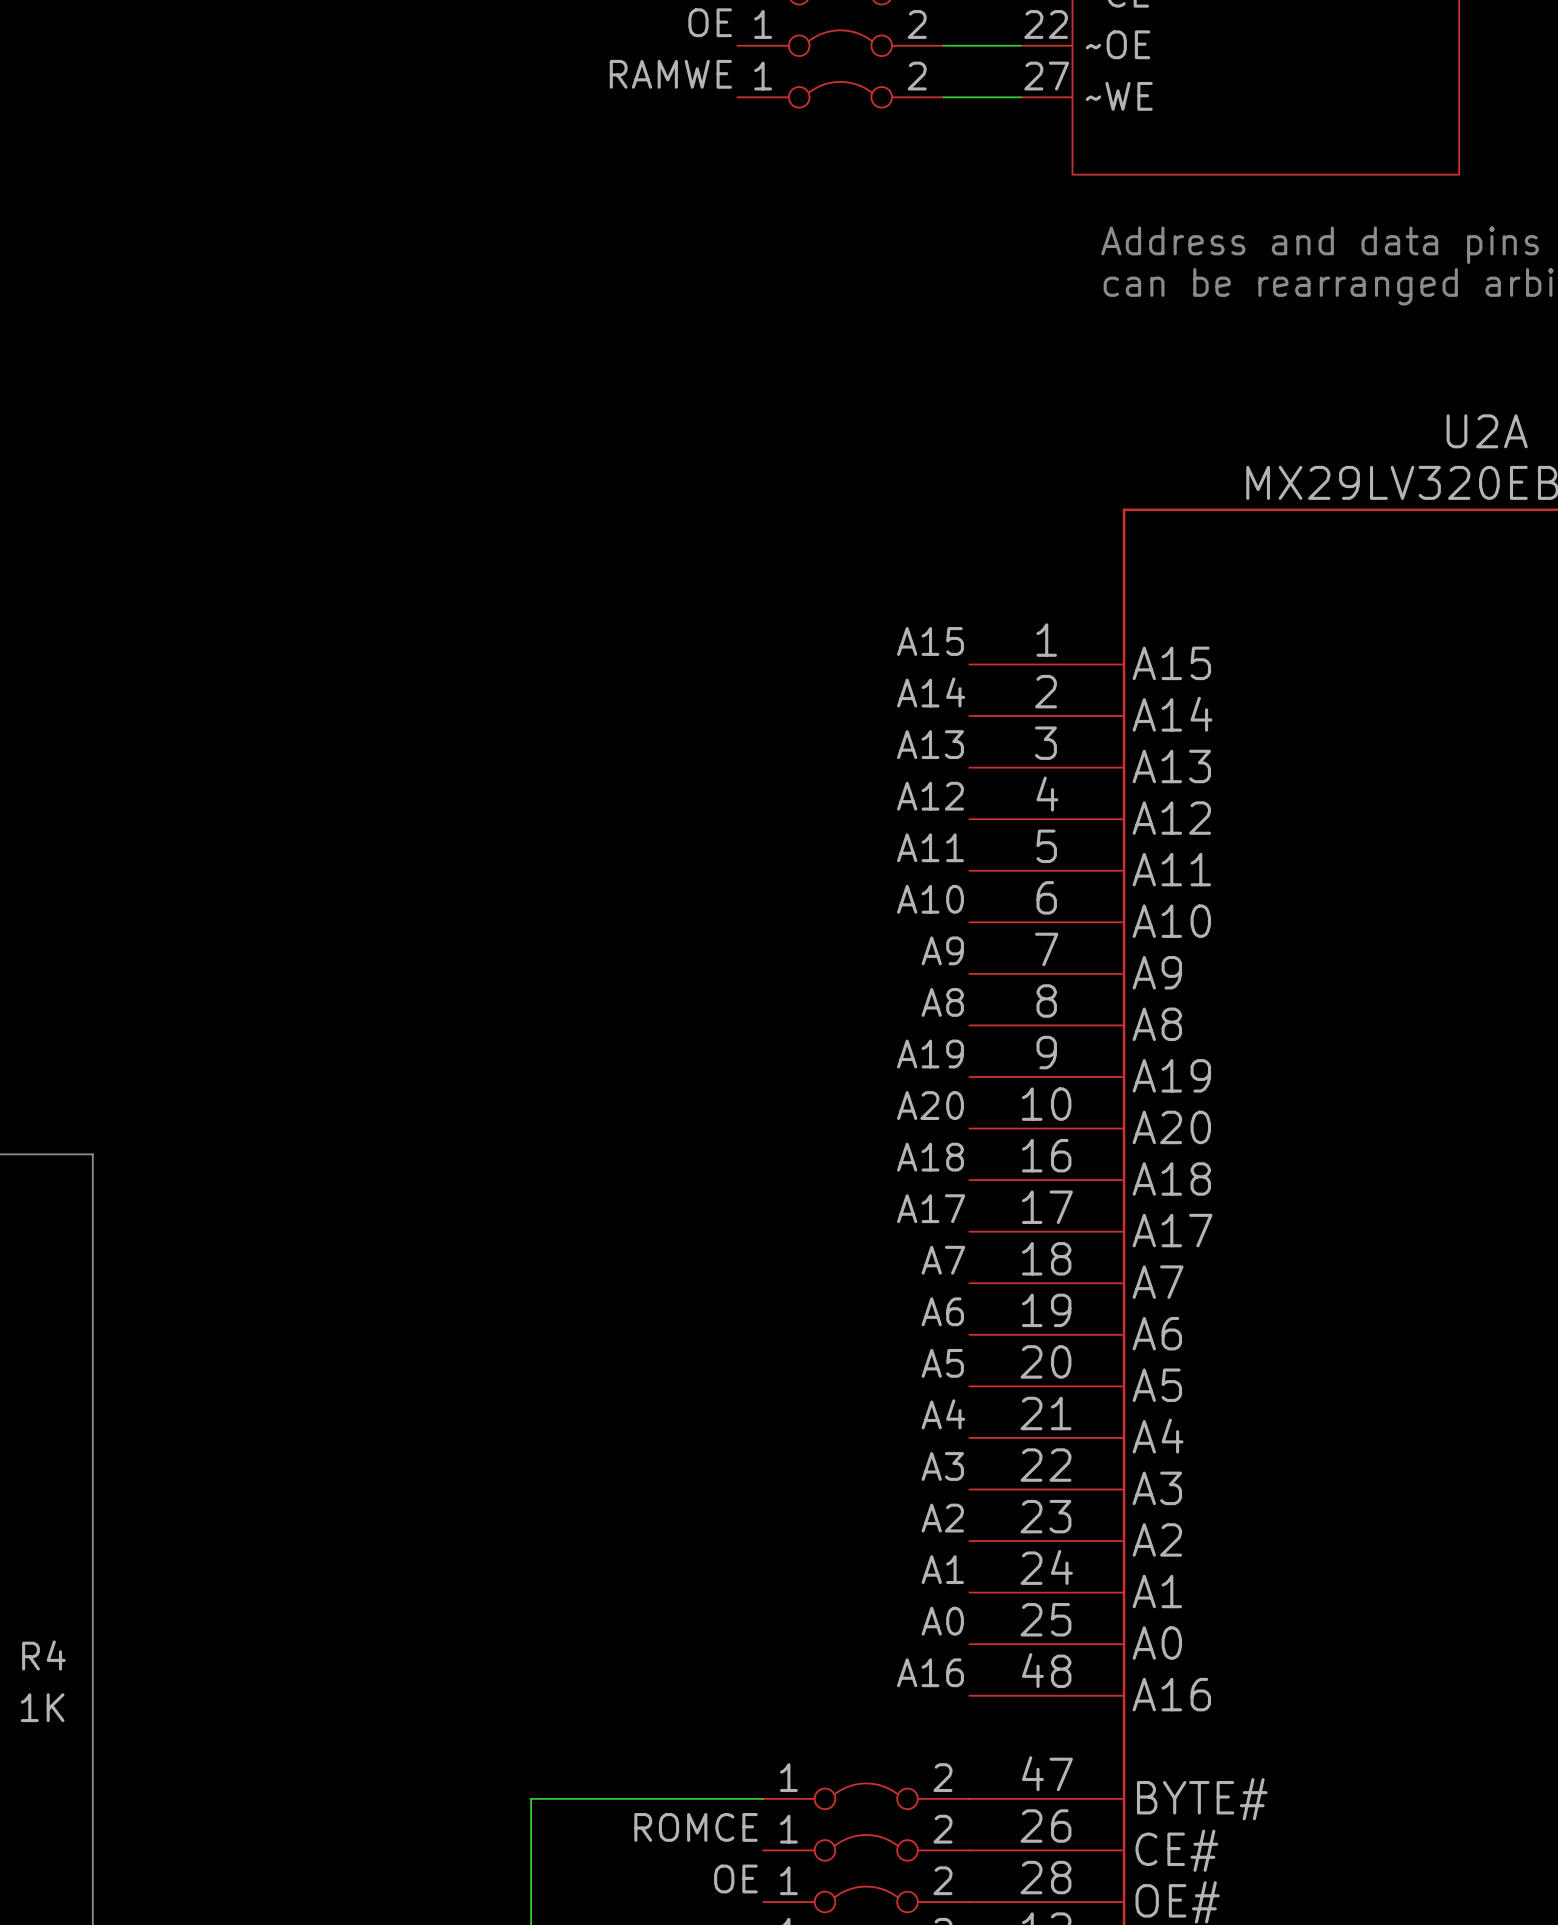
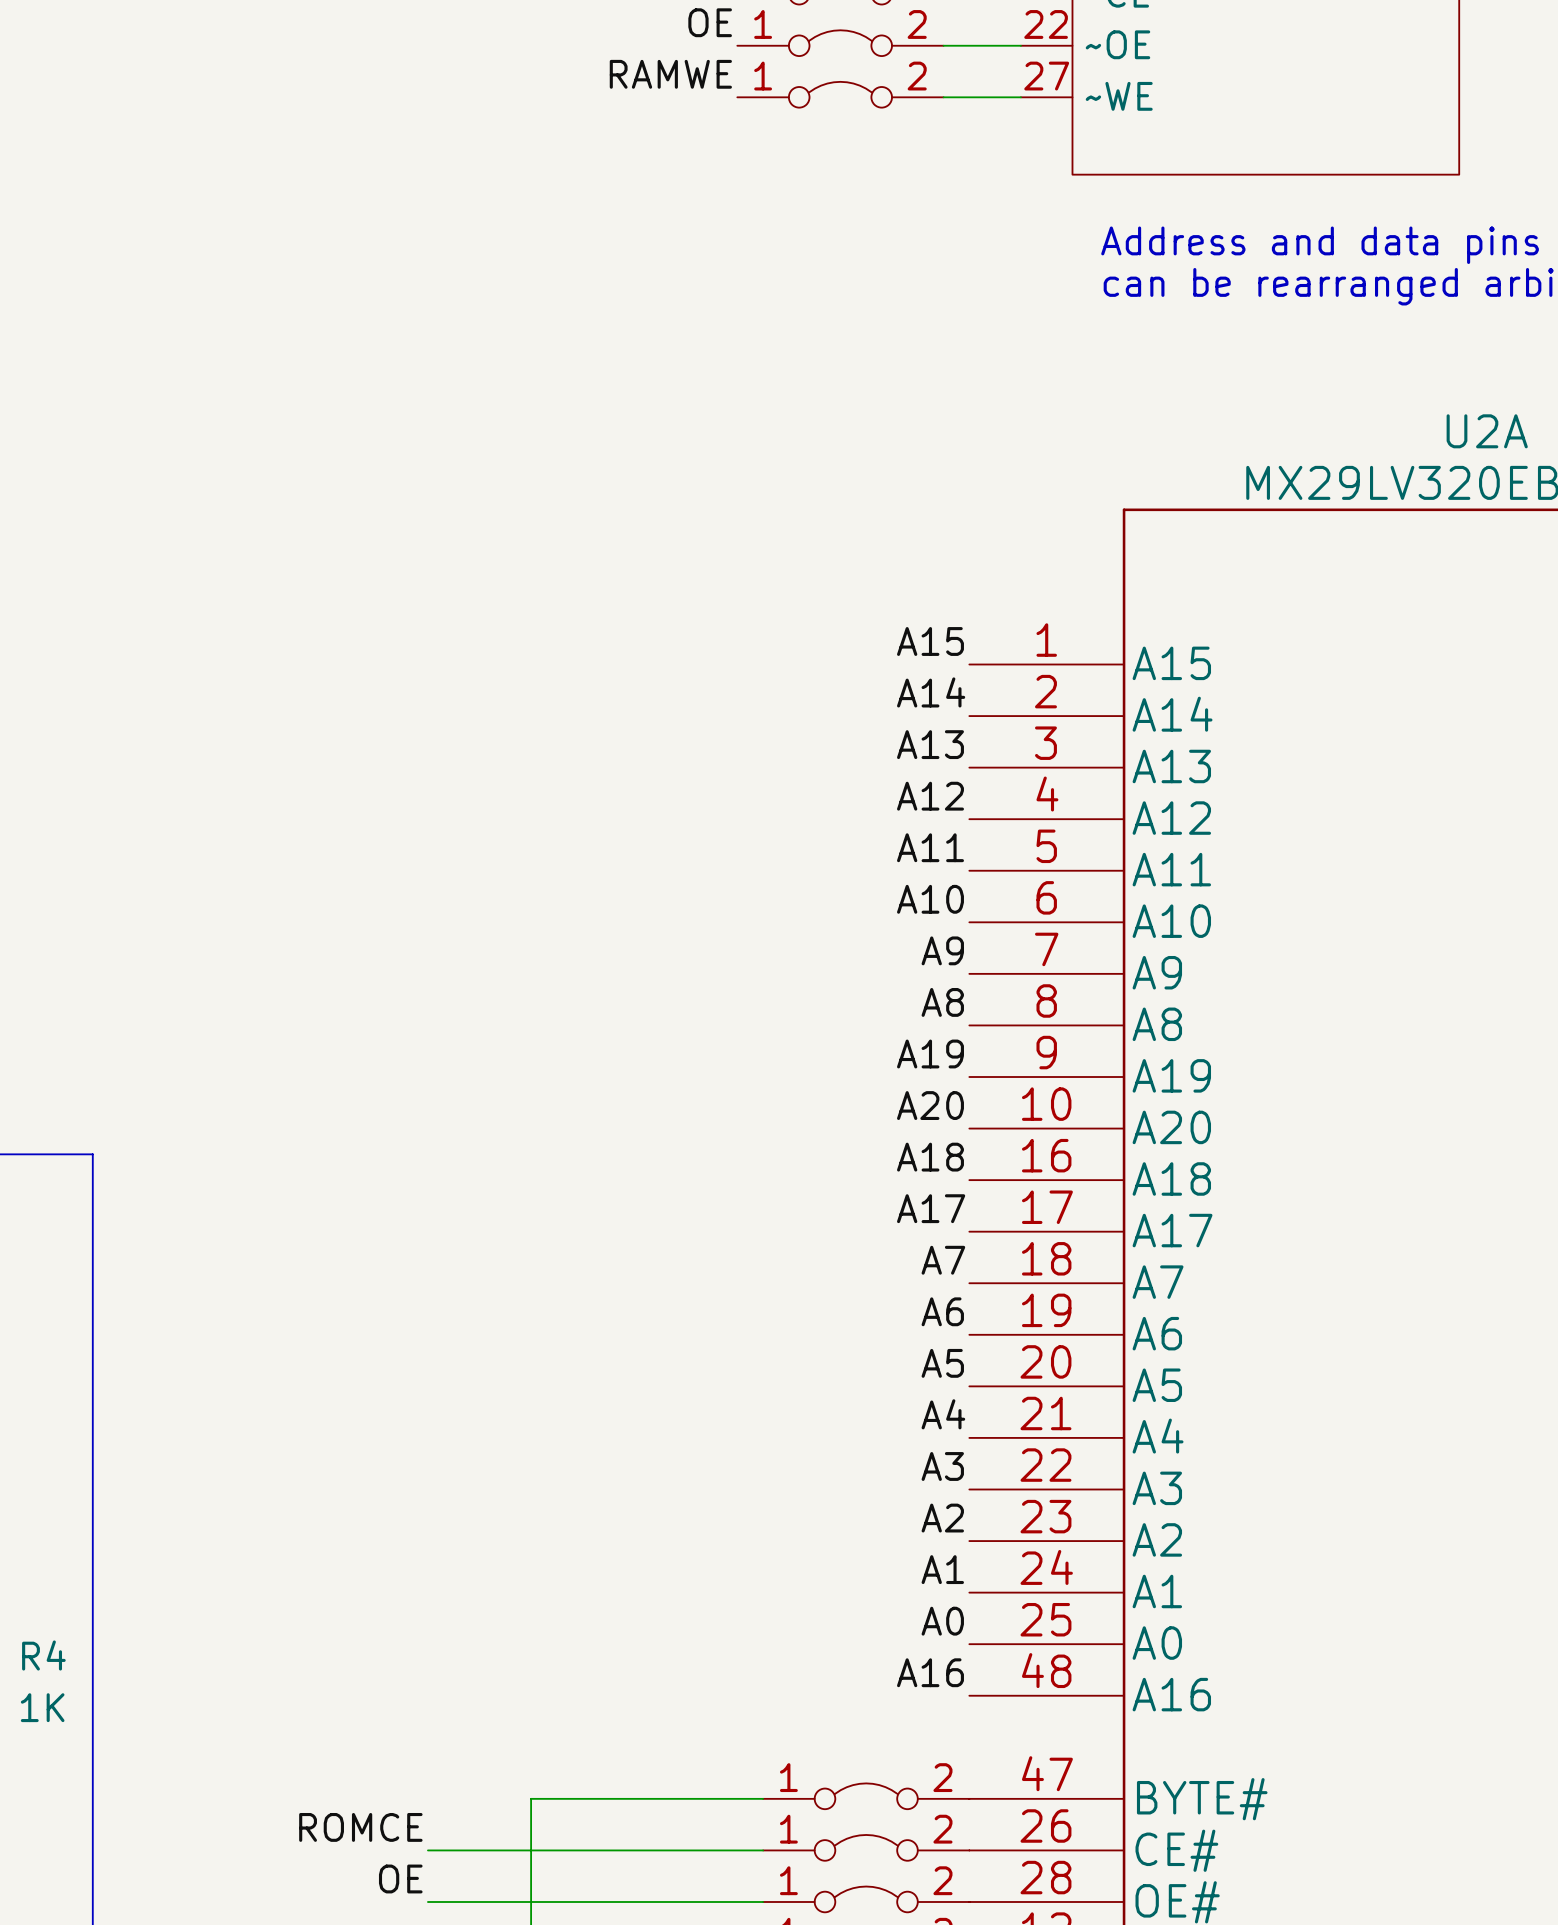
label position: ROMCE (696, 1827) -> ROMCE (360, 1827)
wire: none -> (427, 1850) (763, 1850)
label position: OE (735, 1878) -> OE (400, 1878)
wire: none -> (427, 1901) (763, 1901)

